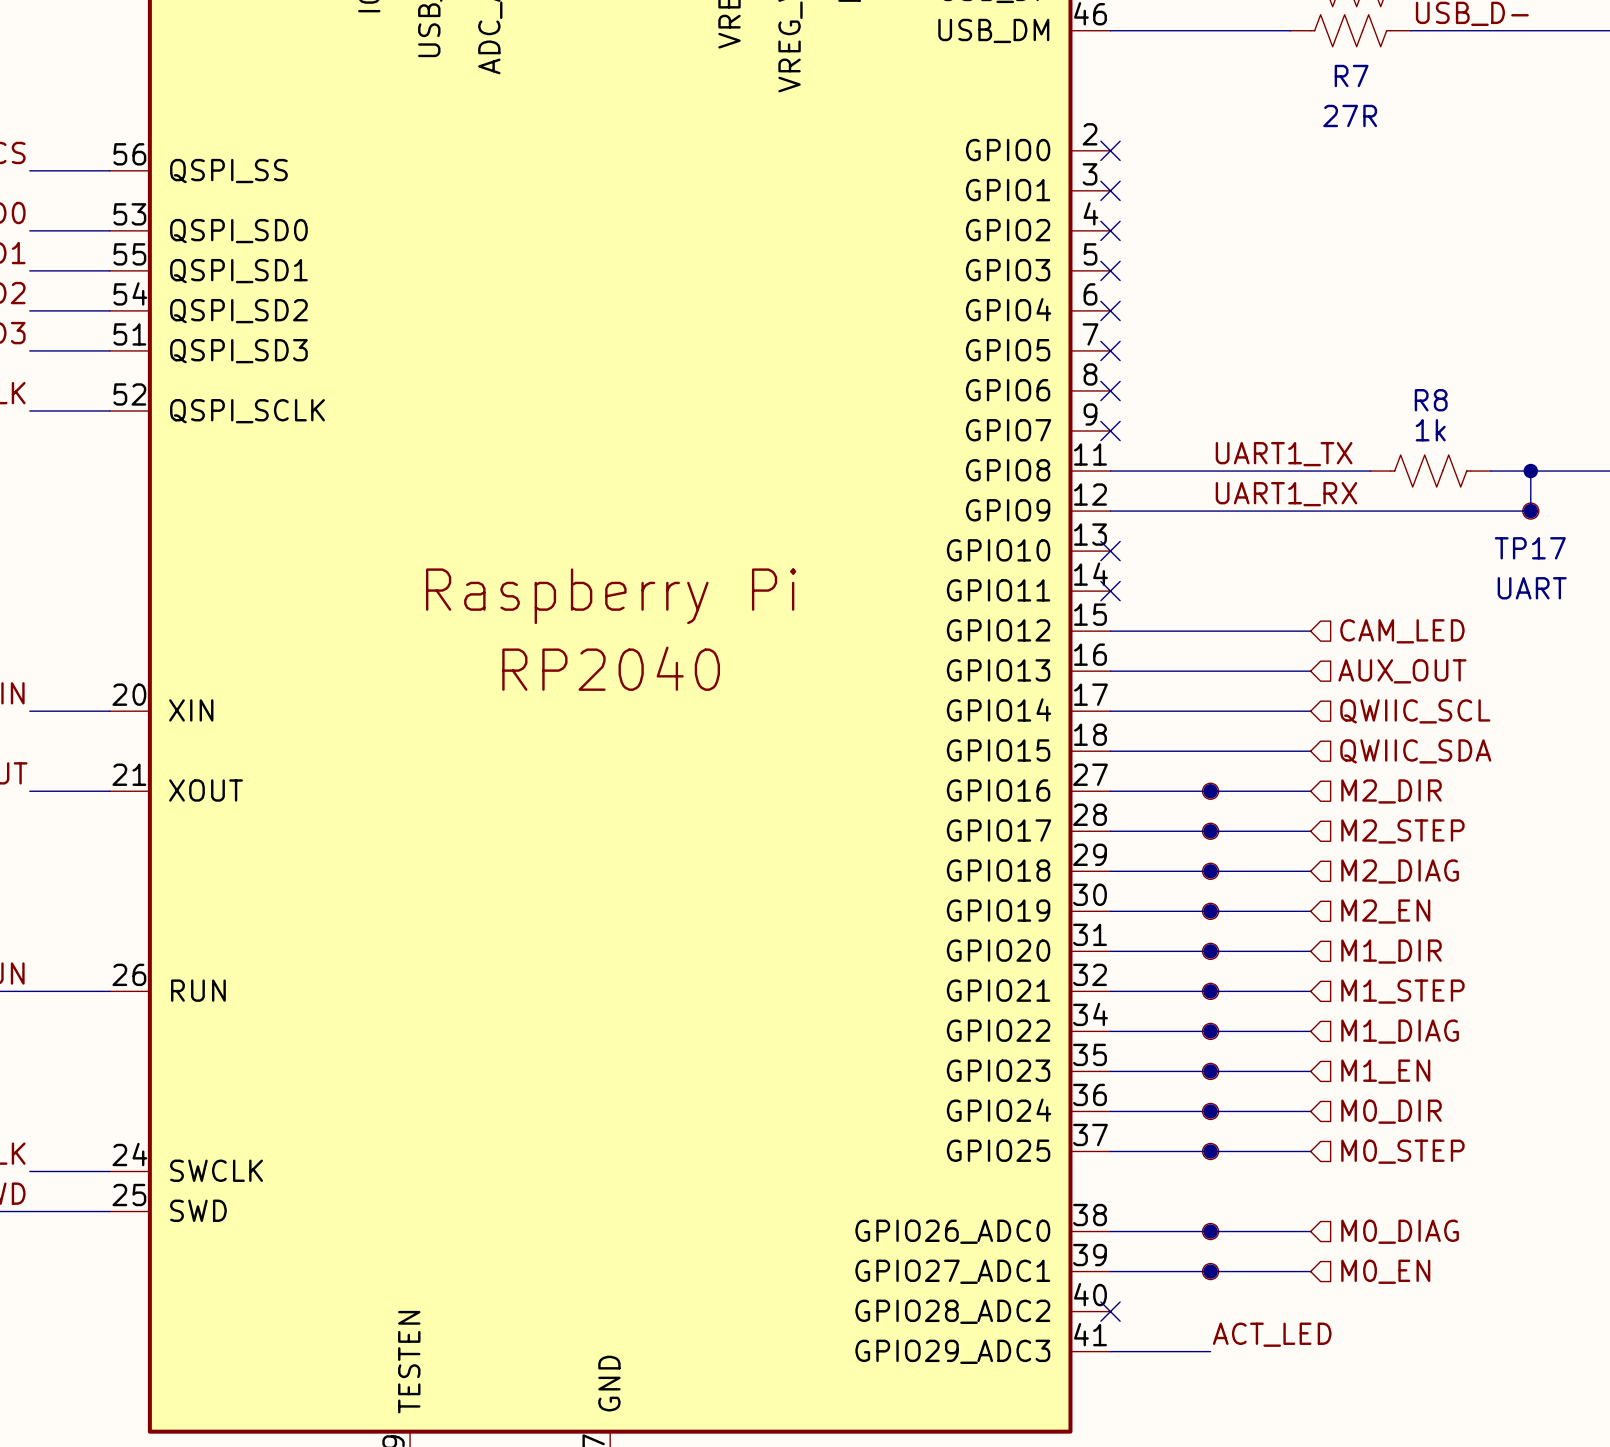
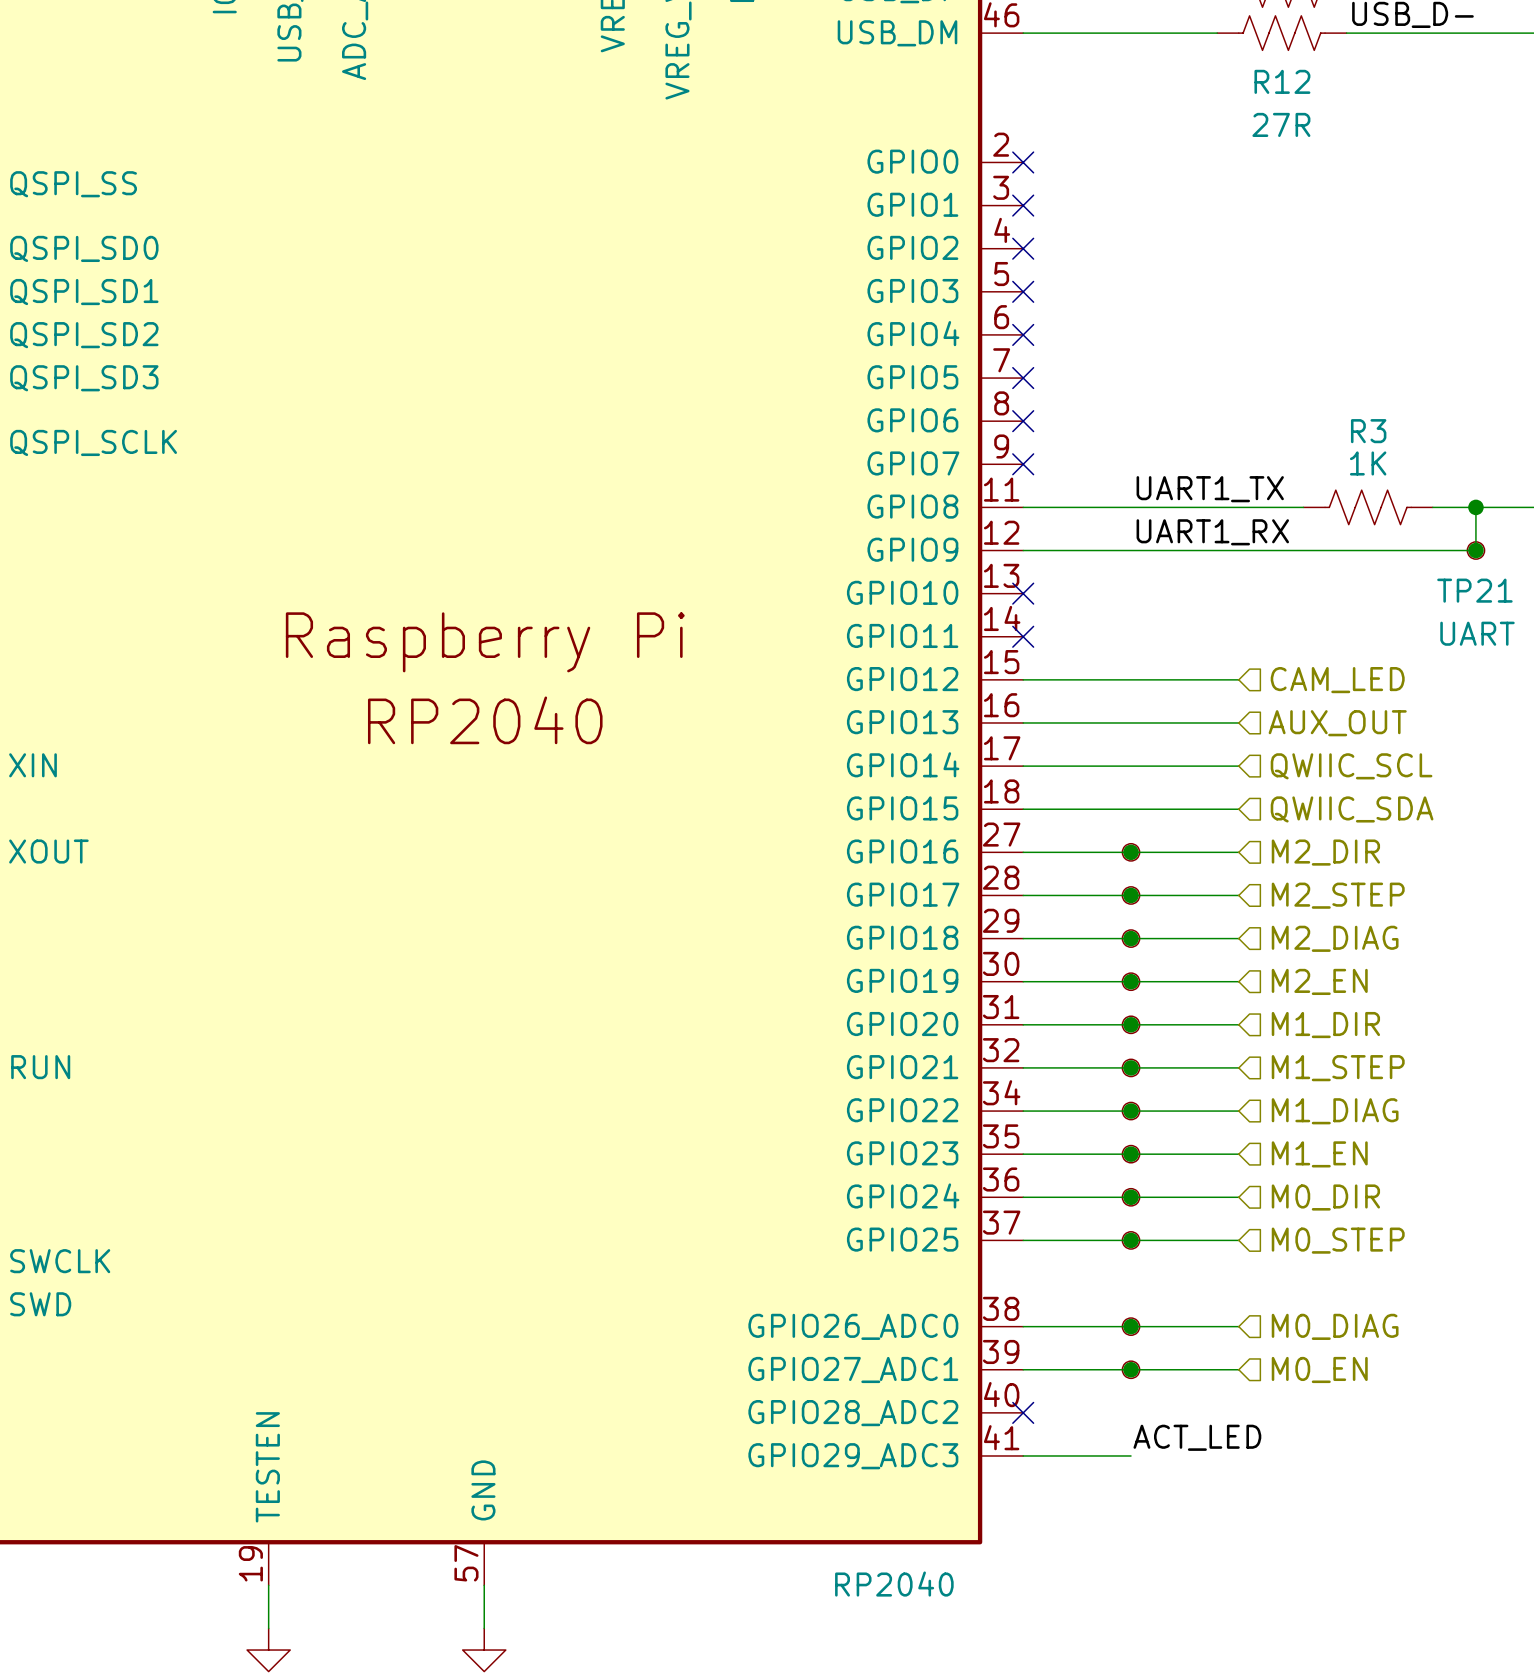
R7 name: R7 (1351, 75) -> R12 (1282, 81)
R8 name: R8 (1431, 400) -> R3 (1368, 431)
R8 value: 1k (1430, 430) -> 1K (1368, 463)
TP17 name: TP17 (1530, 548) -> TP21 (1474, 590)

